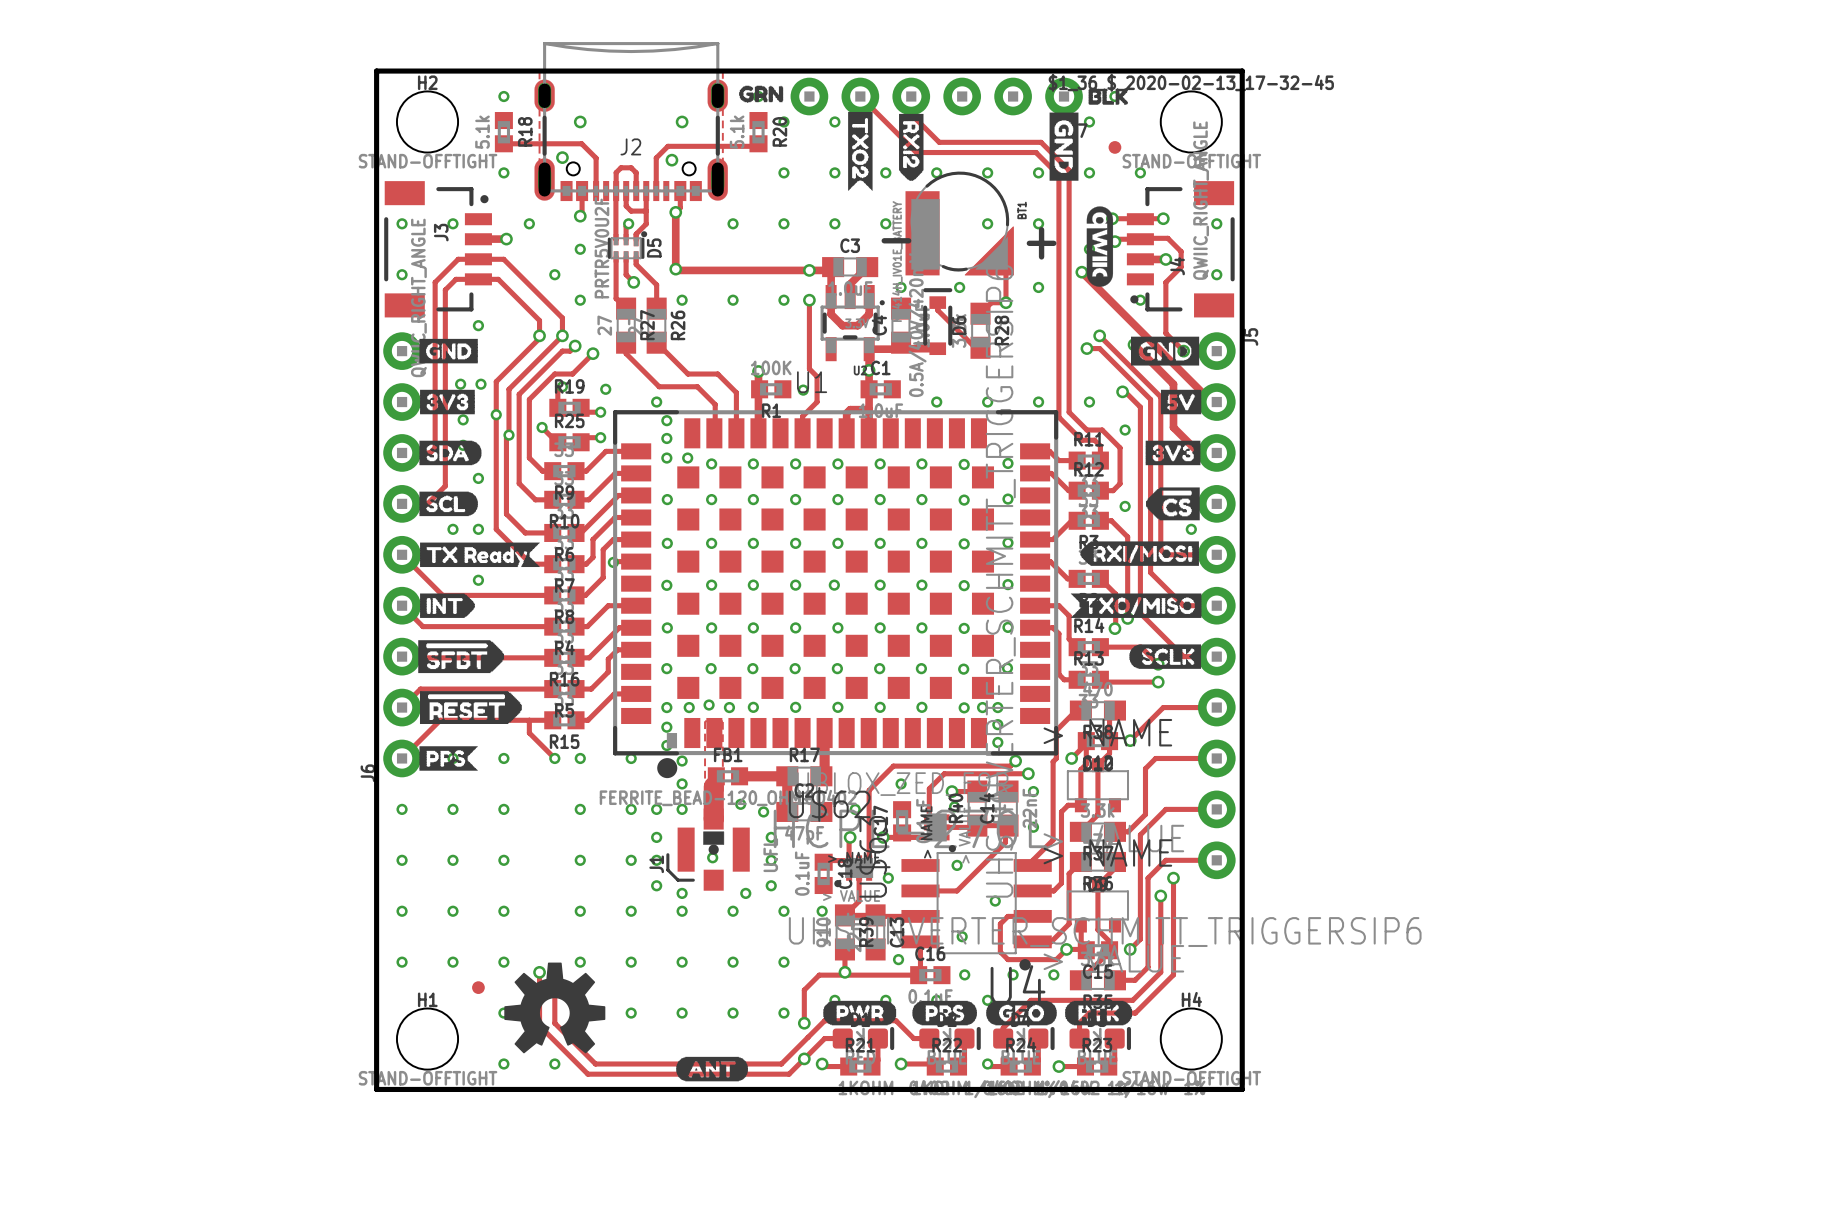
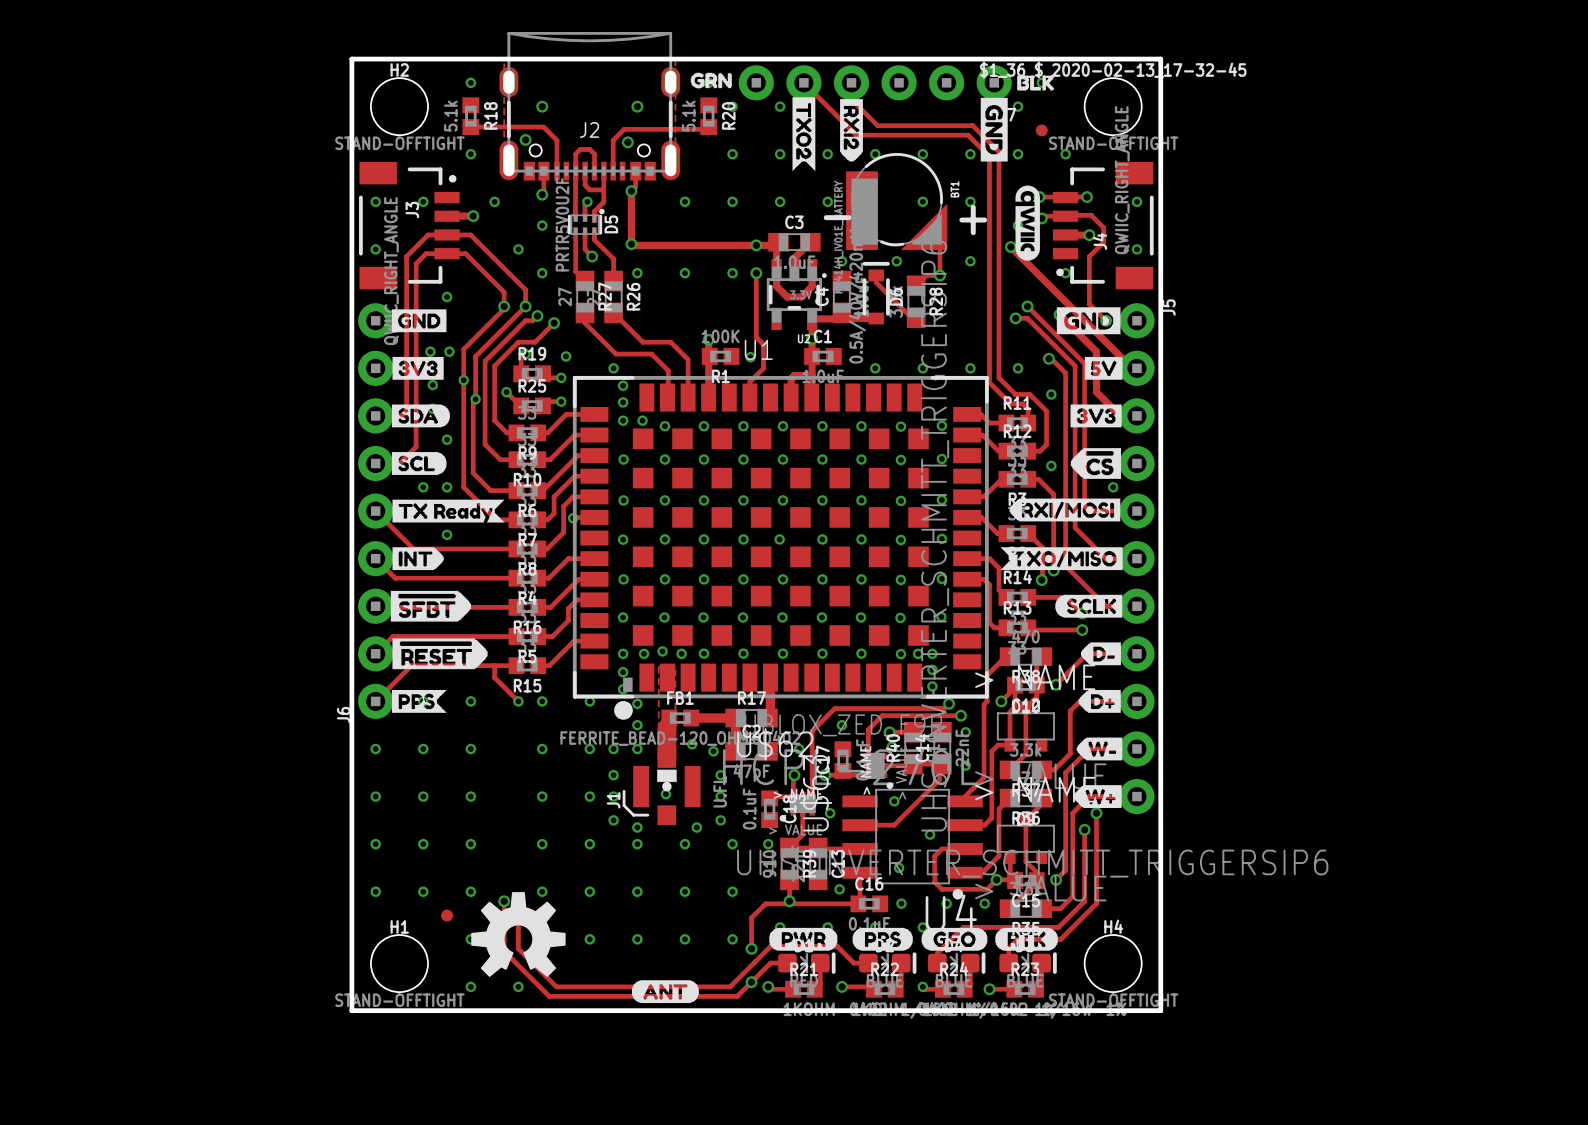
drawing: none -> [1081, 642, 1121, 666]
drawing: none -> [1078, 689, 1121, 713]
drawing: none -> [1076, 737, 1123, 761]
drawing: none -> [1073, 785, 1122, 808]

